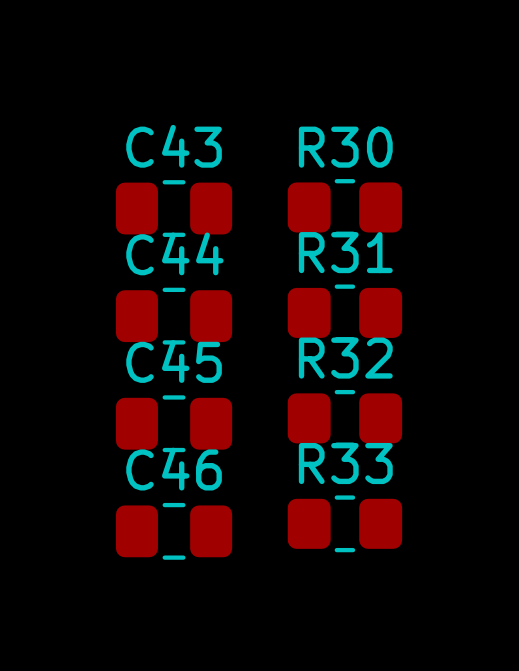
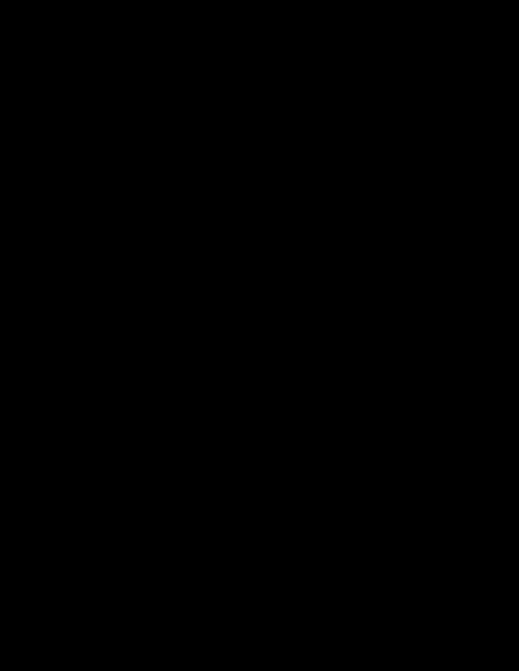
R30: (344, 207) -> none
C43: (174, 208) -> none
R31: (344, 312) -> none
C44: (174, 316) -> none
R32: (344, 418) -> none
C45: (174, 423) -> none
R33: (344, 523) -> none
C46: (174, 531) -> none

